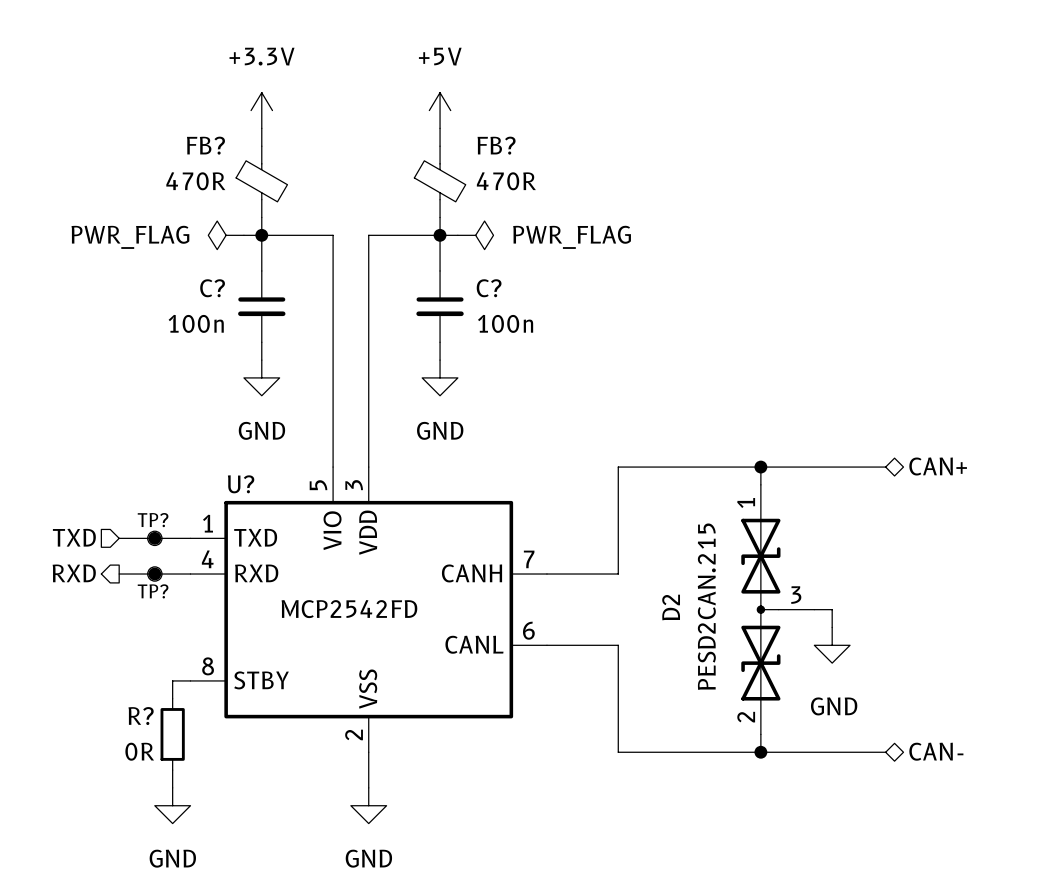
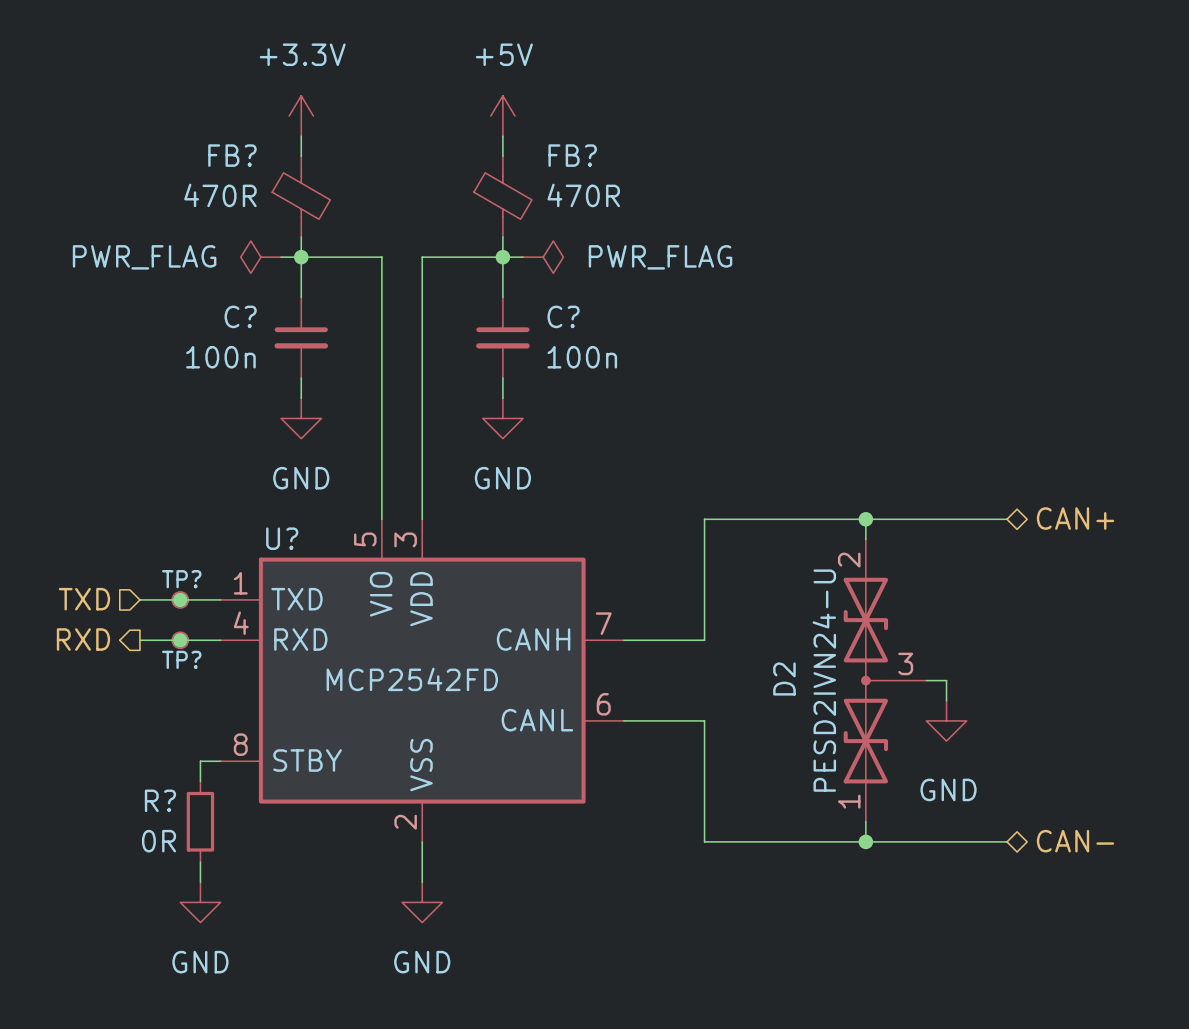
D2 value: PESD2CAN.215 (706, 606) -> PESD2IVN24-U (824, 680)
D2 flip: as is (760, 609) -> up-down (865, 680)

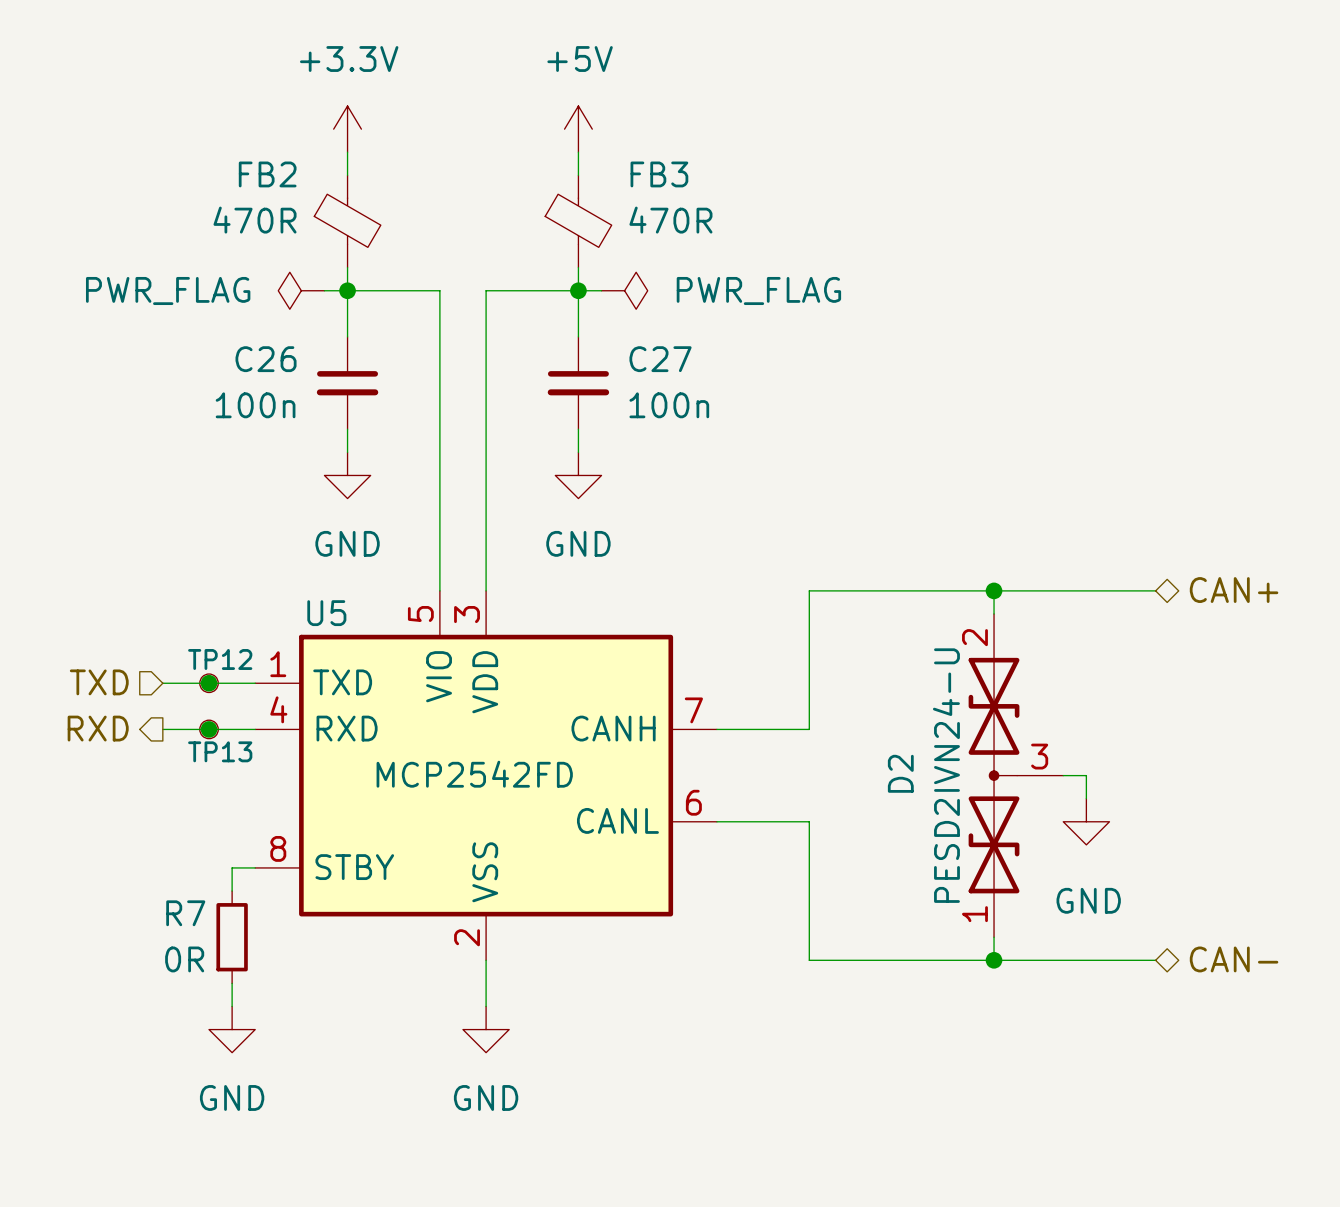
FB? name: FB? (232, 155) -> FB2 (267, 174)
FB? name: FB? (572, 155) -> FB3 (659, 174)
C? name: C? (240, 316) -> C26 (266, 359)
C? name: C? (563, 316) -> C27 (660, 359)
U? name: U? (282, 538) -> U5 (326, 613)
TP? name: TP? (181, 579) -> TP12 (220, 659)
TP? name: TP? (181, 659) -> TP13 (220, 751)
R? name: R? (160, 800) -> R7 (185, 913)

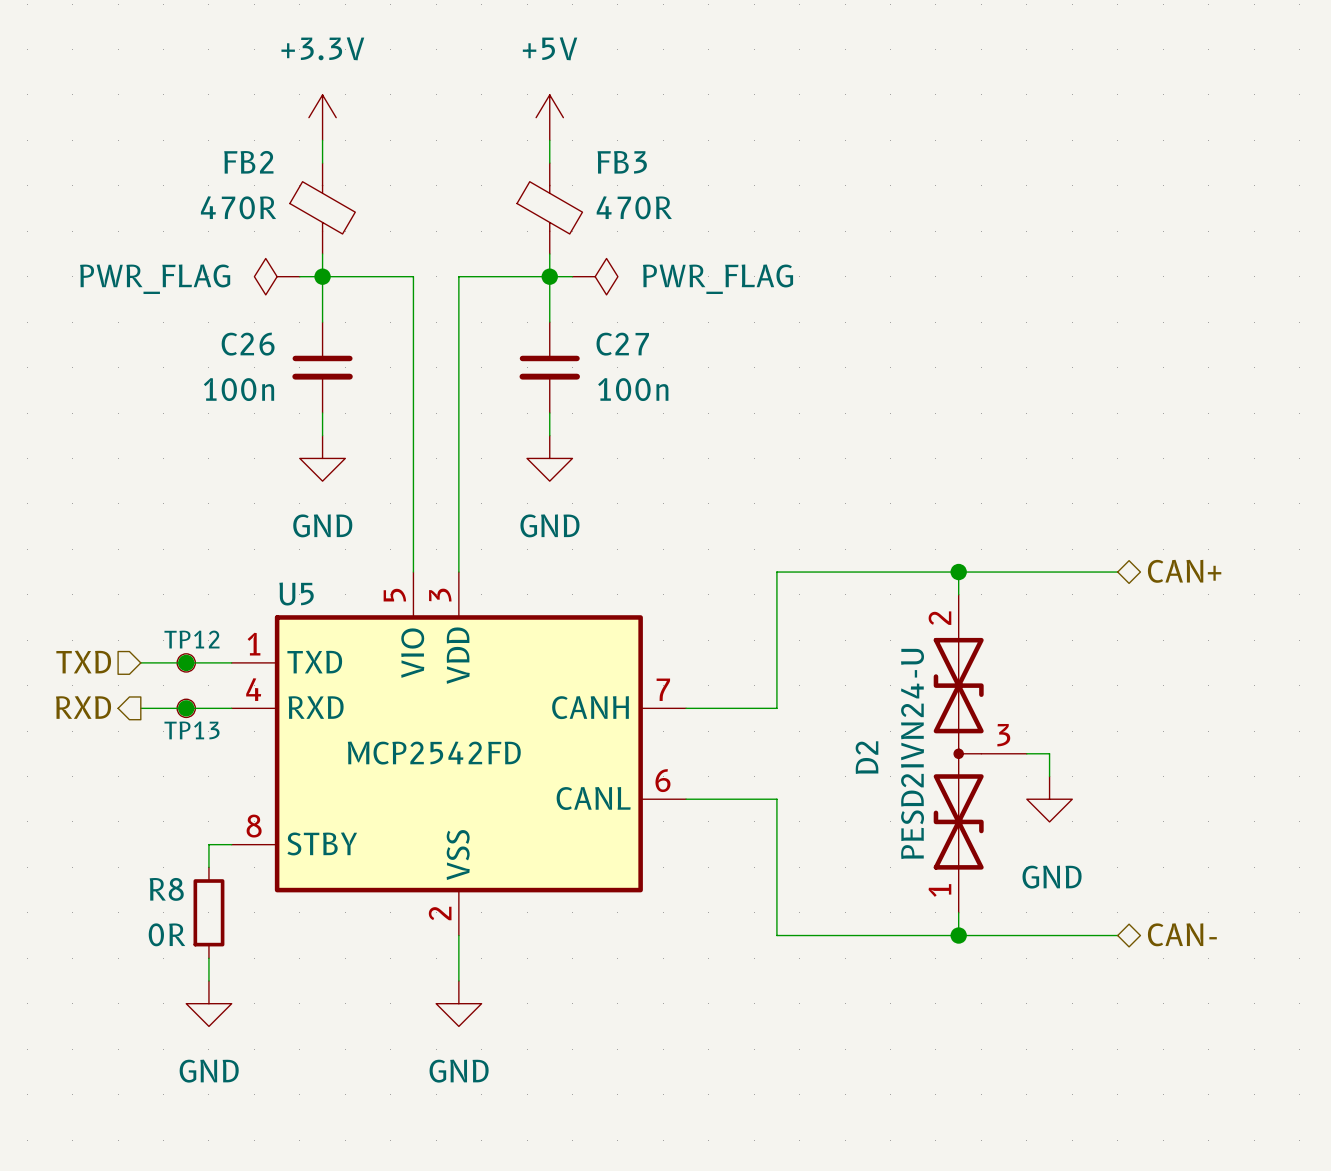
R7 name: R7 (185, 913) -> R8 (166, 889)

